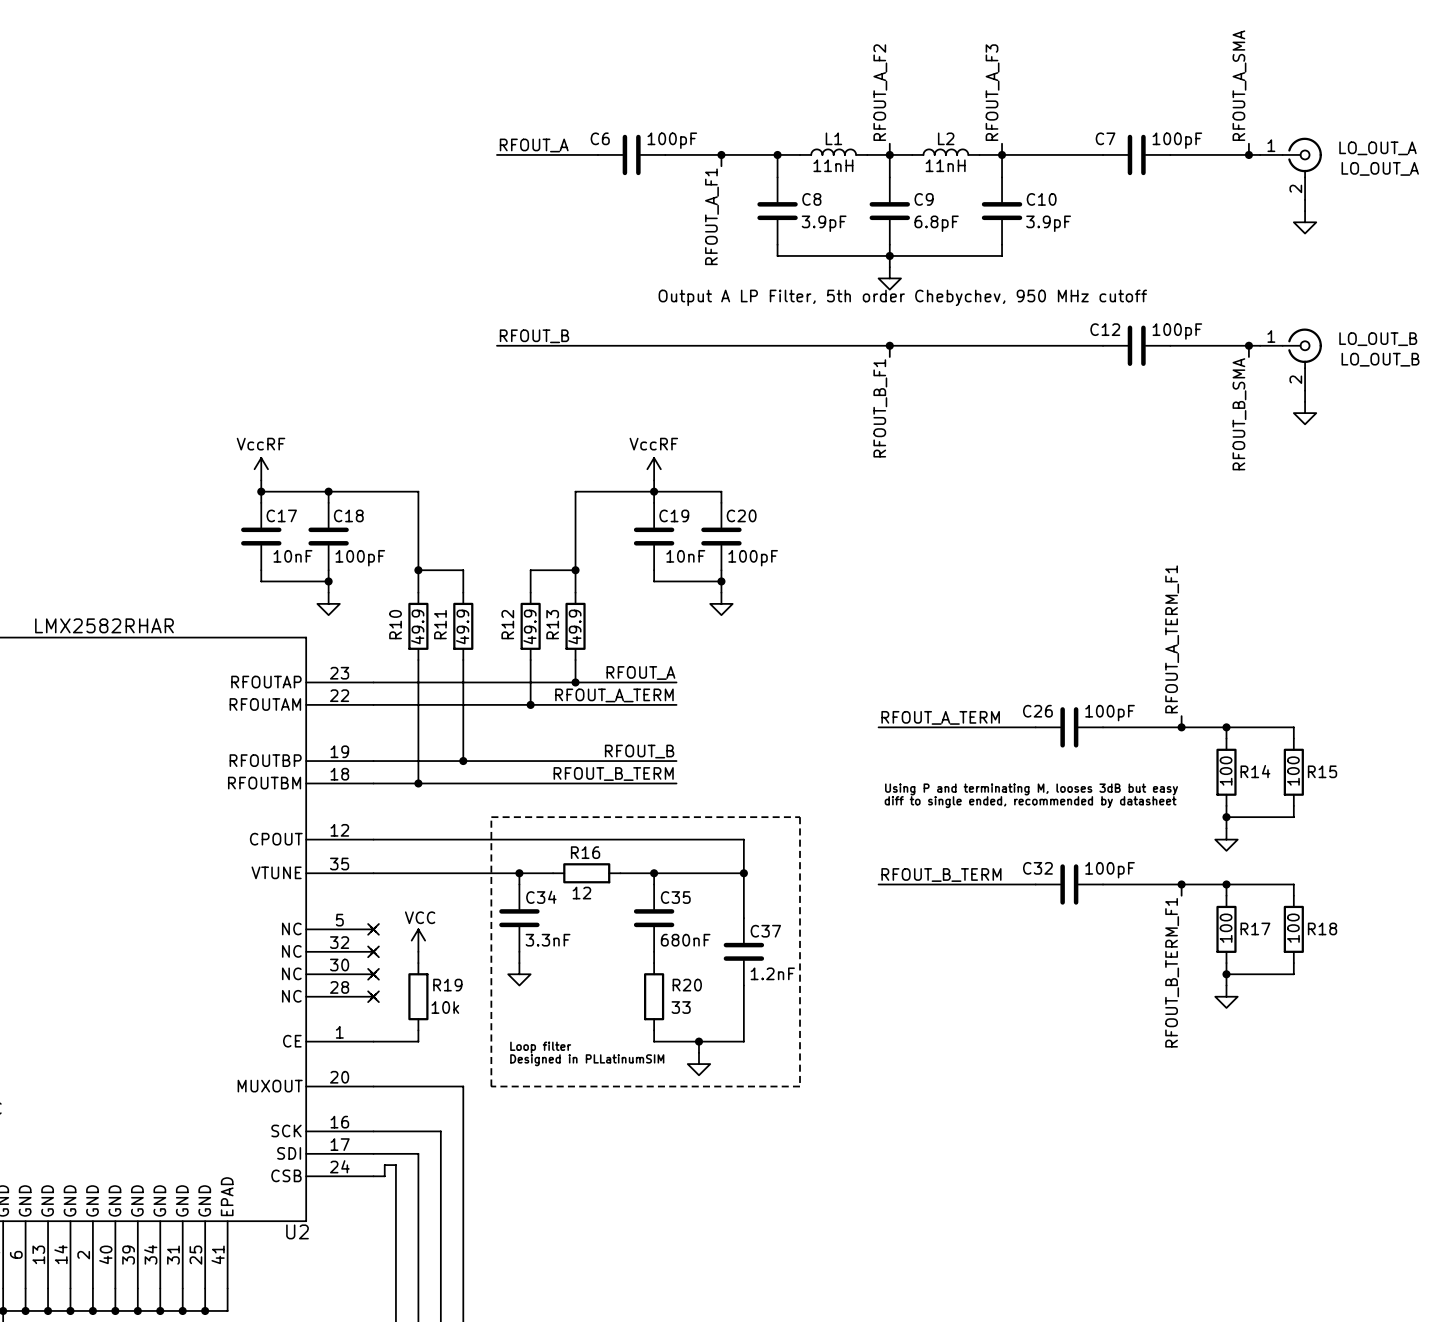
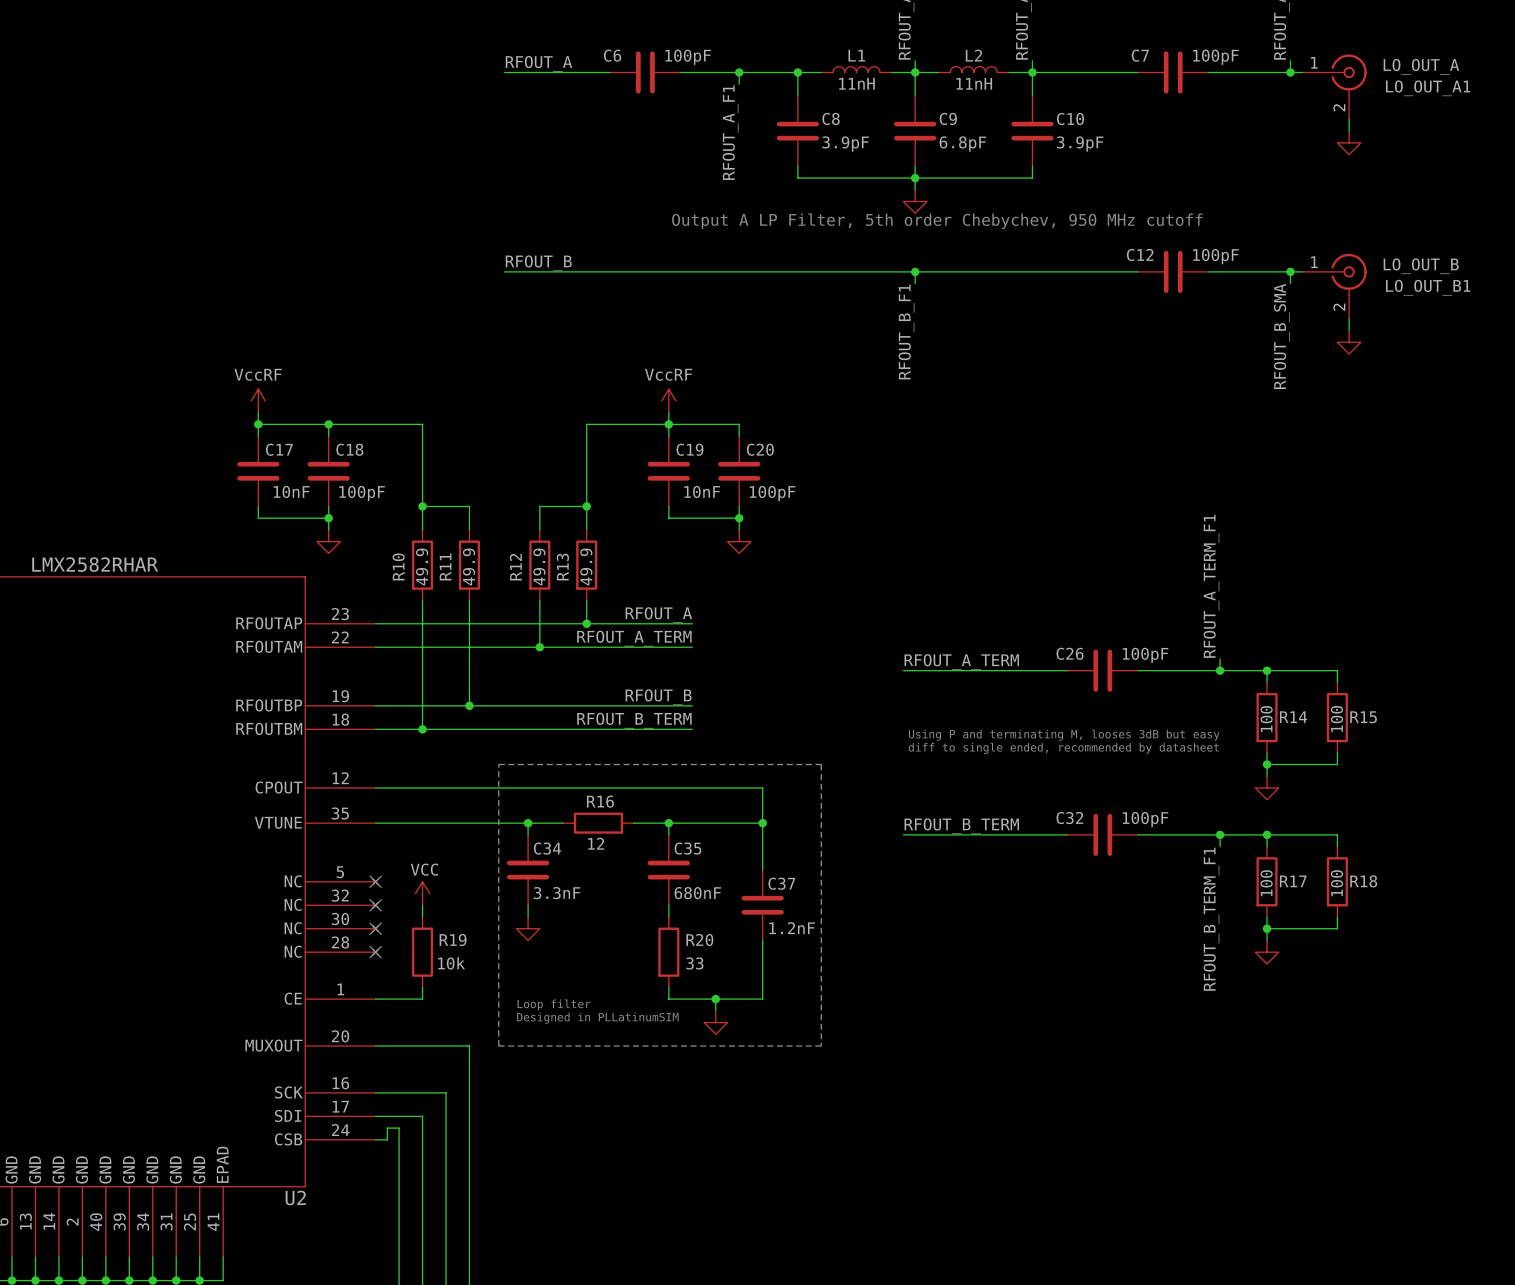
LO_OUT_A name: LO_OUT_A (1380, 168) -> LO_OUT_A1 (1428, 88)
LO_OUT_B name: LO_OUT_B (1380, 359) -> LO_OUT_B1 (1428, 287)

